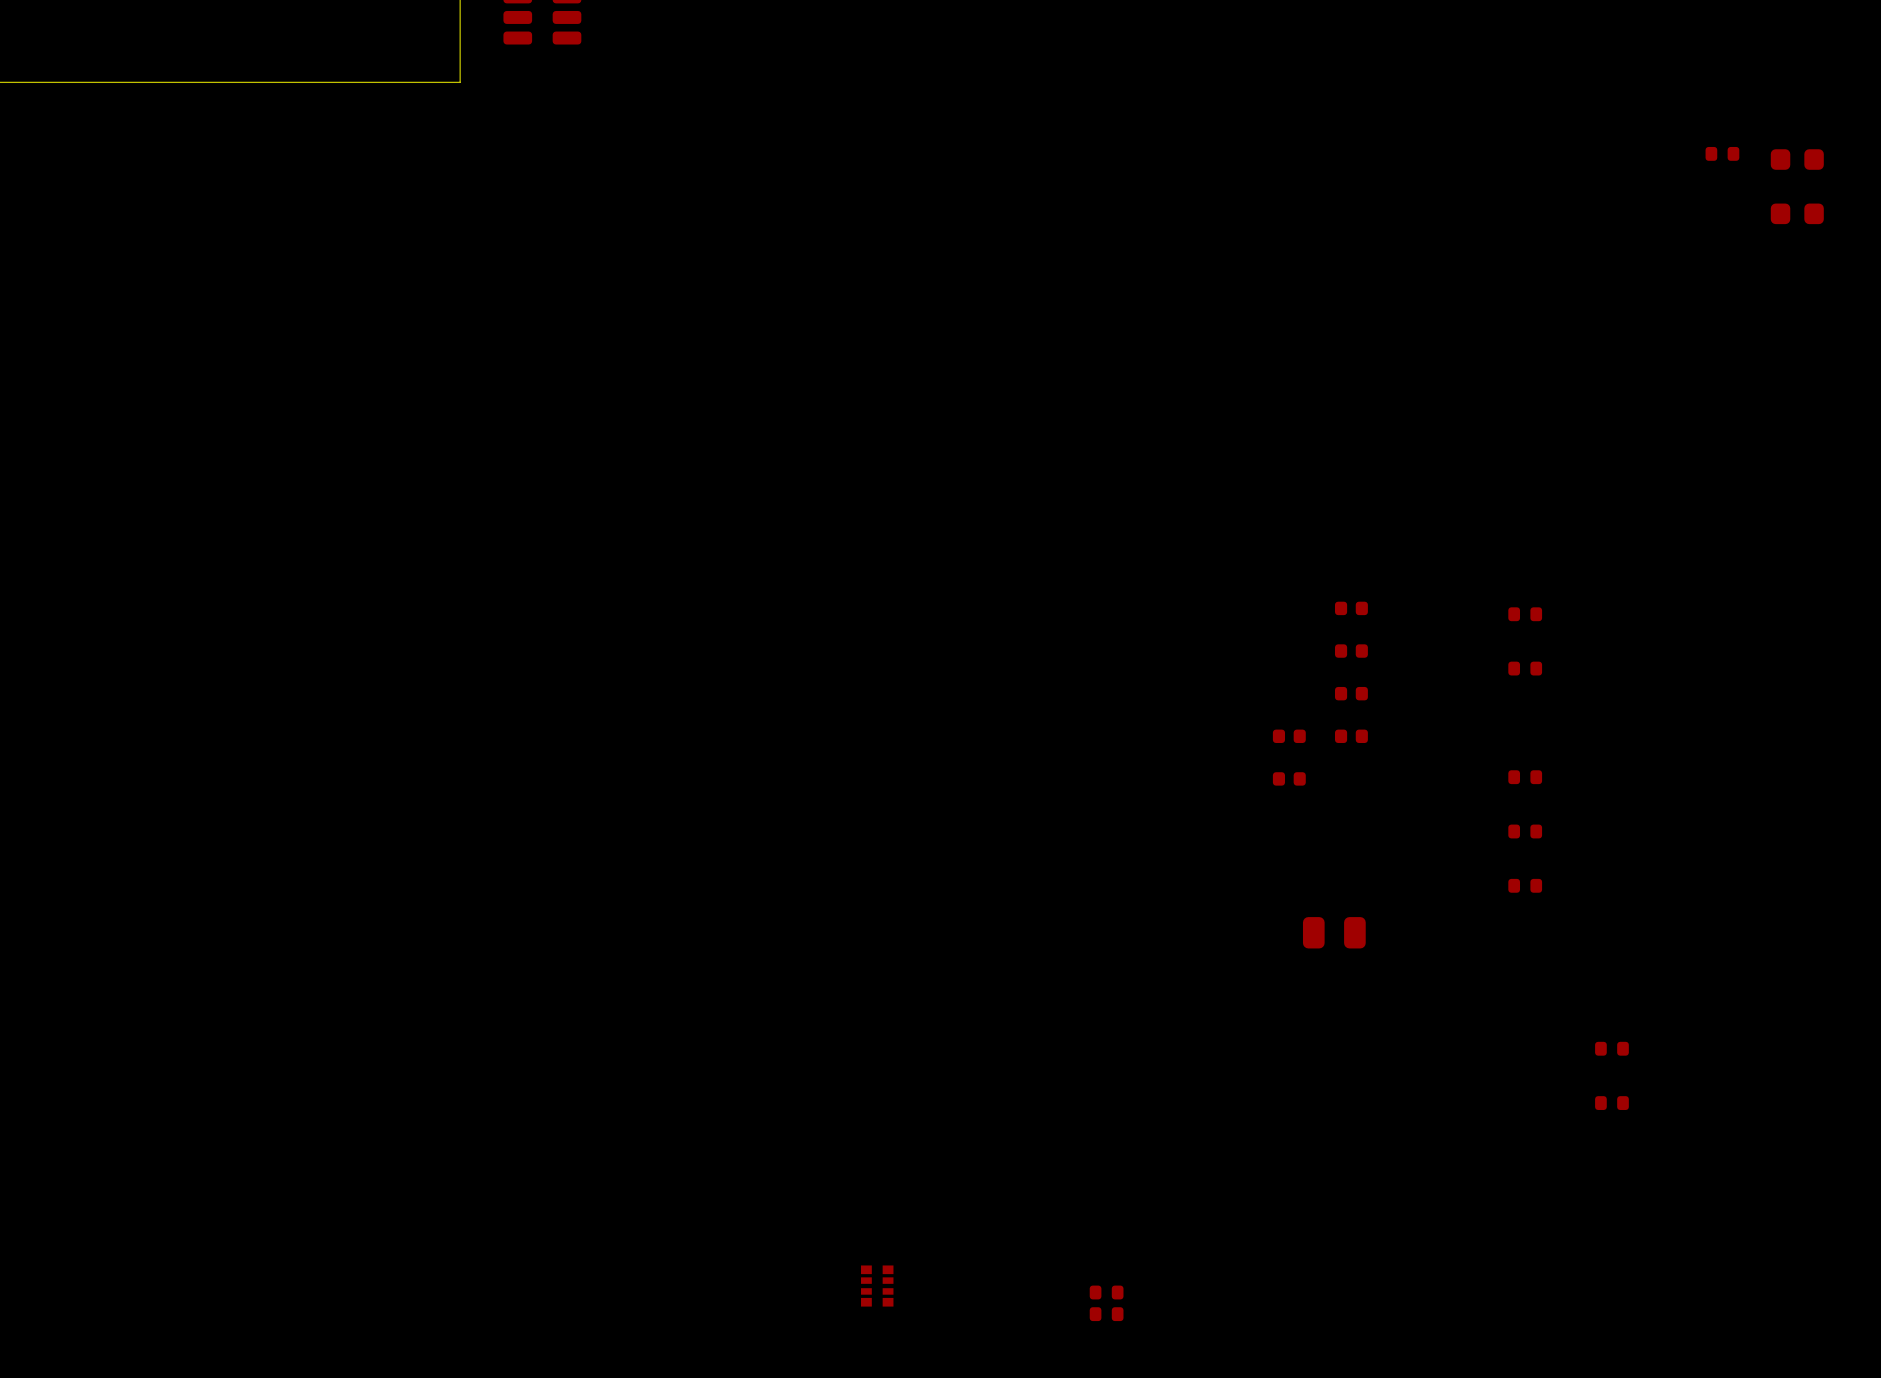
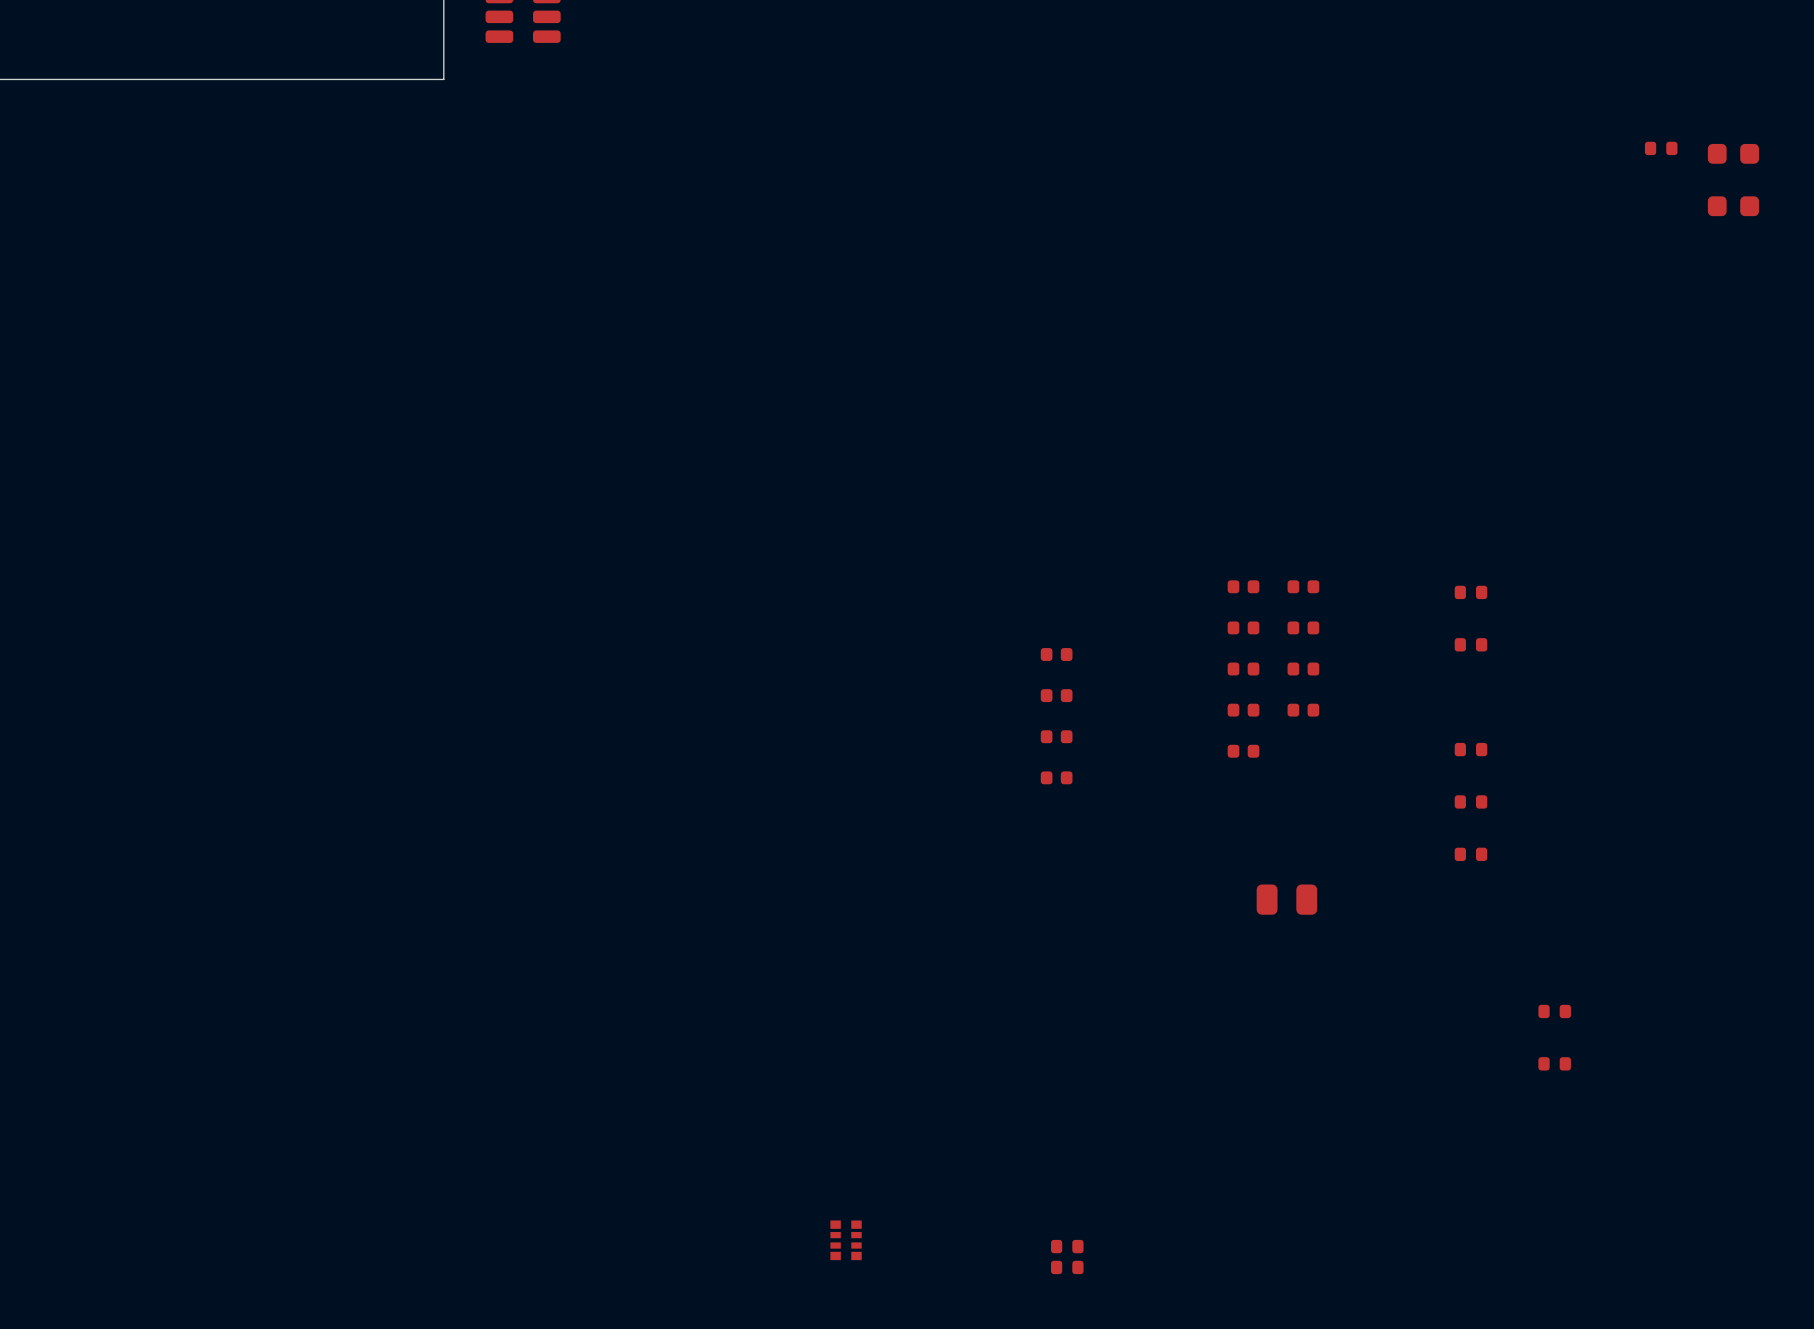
part: none -> (1243, 586)
part: none -> (1243, 627)
part: none -> (1056, 654)
part: none -> (1243, 669)
part: none -> (1056, 695)
part: none -> (1056, 736)
part: none -> (1056, 777)

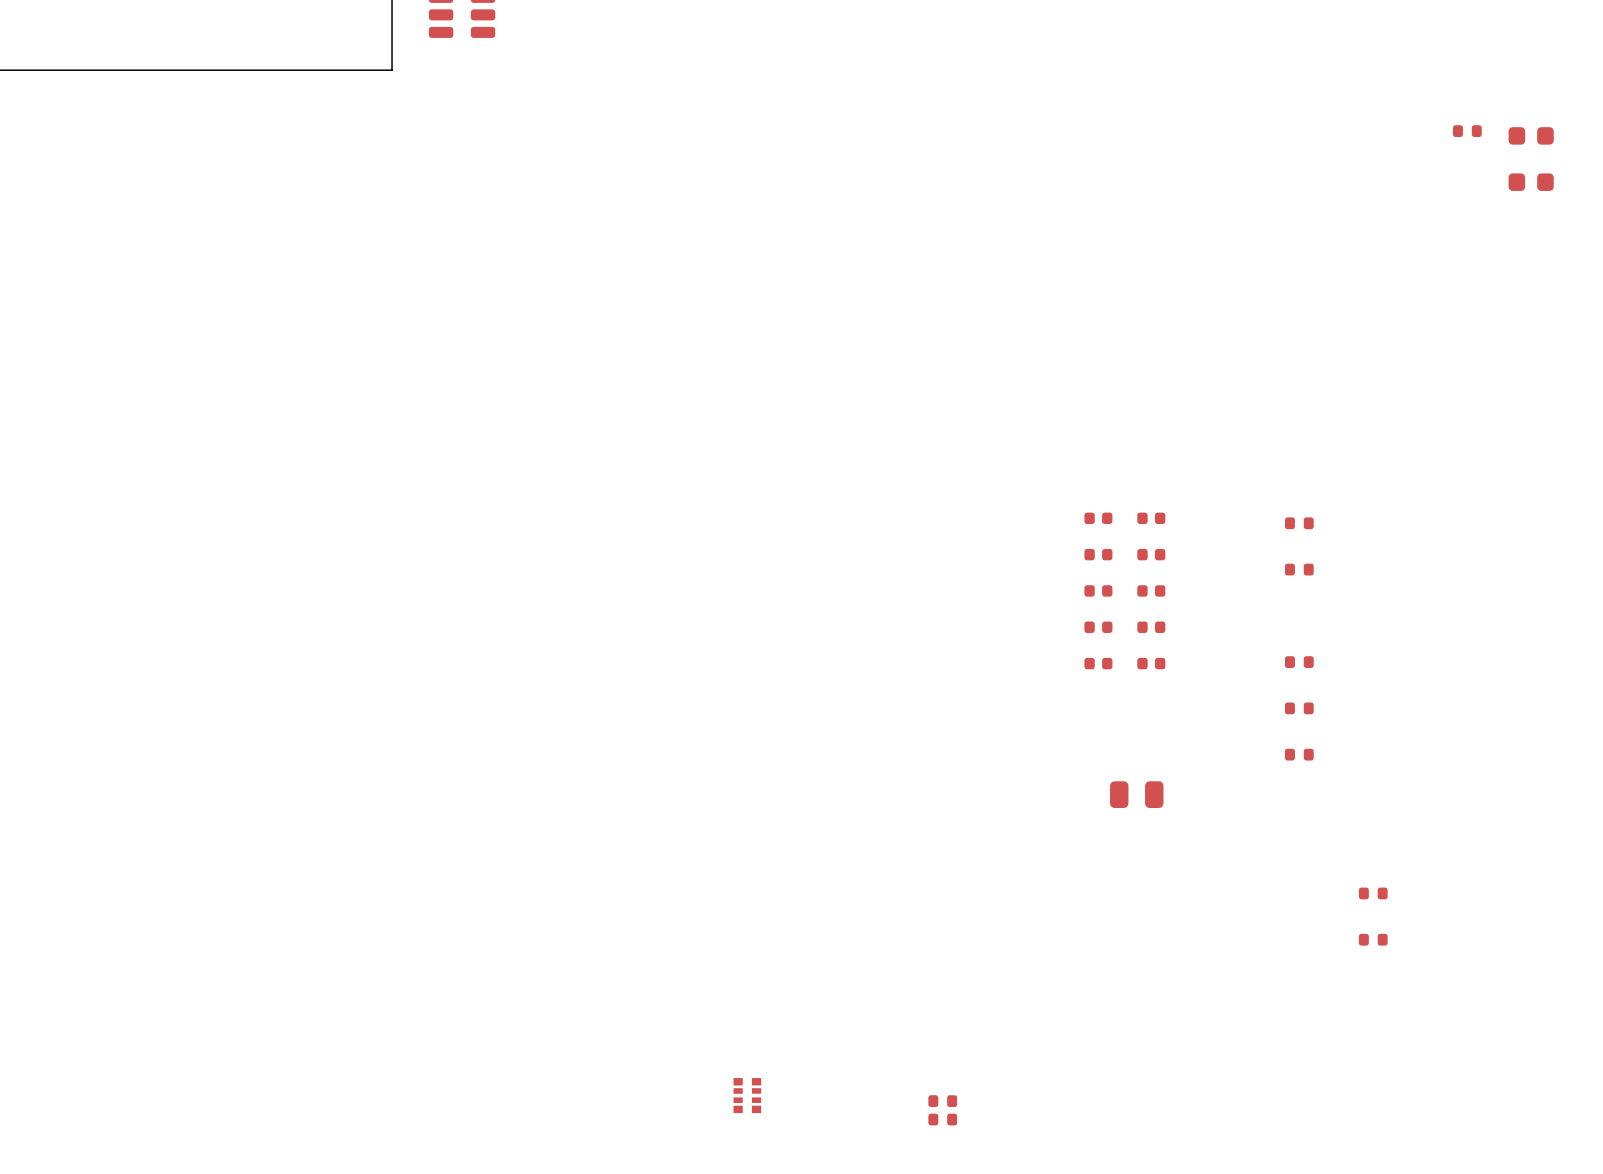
part: (1056, 654) -> none
part: (1056, 695) -> none
part: (1056, 736) -> none
part: none -> (1151, 663)
part: (1056, 777) -> none

